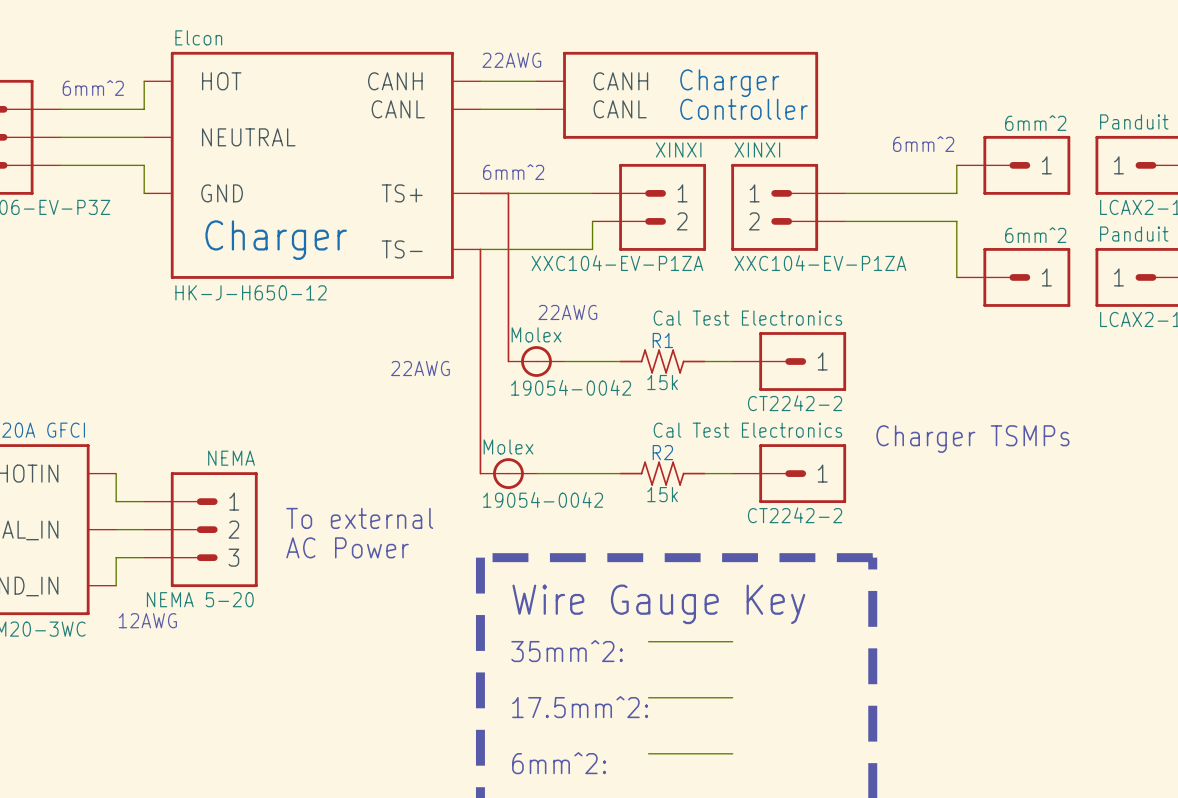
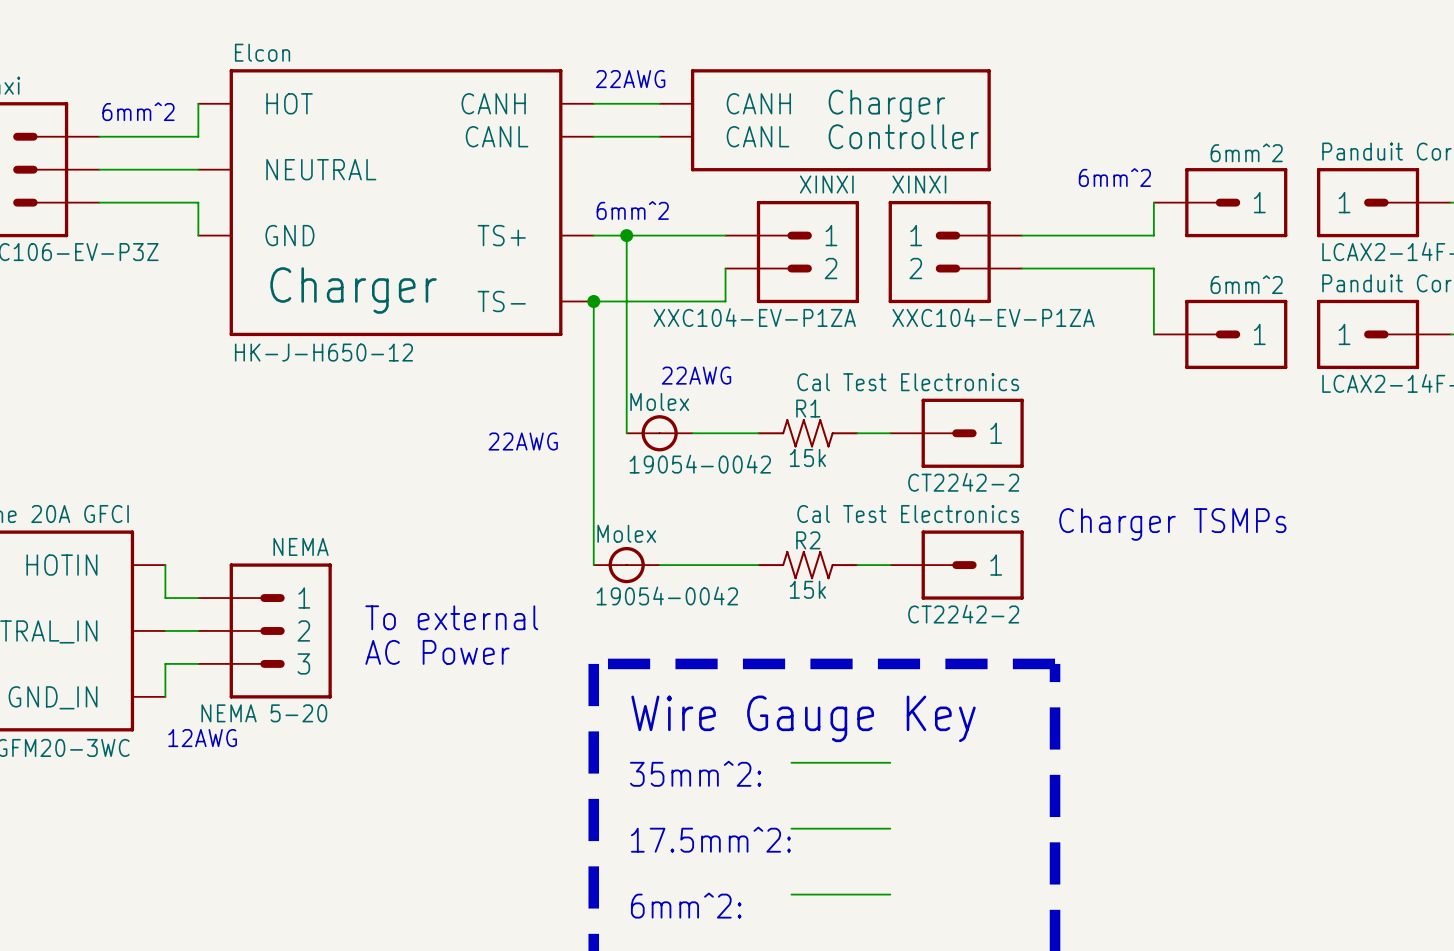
line: (480, 193) (508, 193) (508, 361) -> none
junction: none -> (626, 235)
line: (480, 249) (480, 473) -> none
junction: none -> (593, 301)

